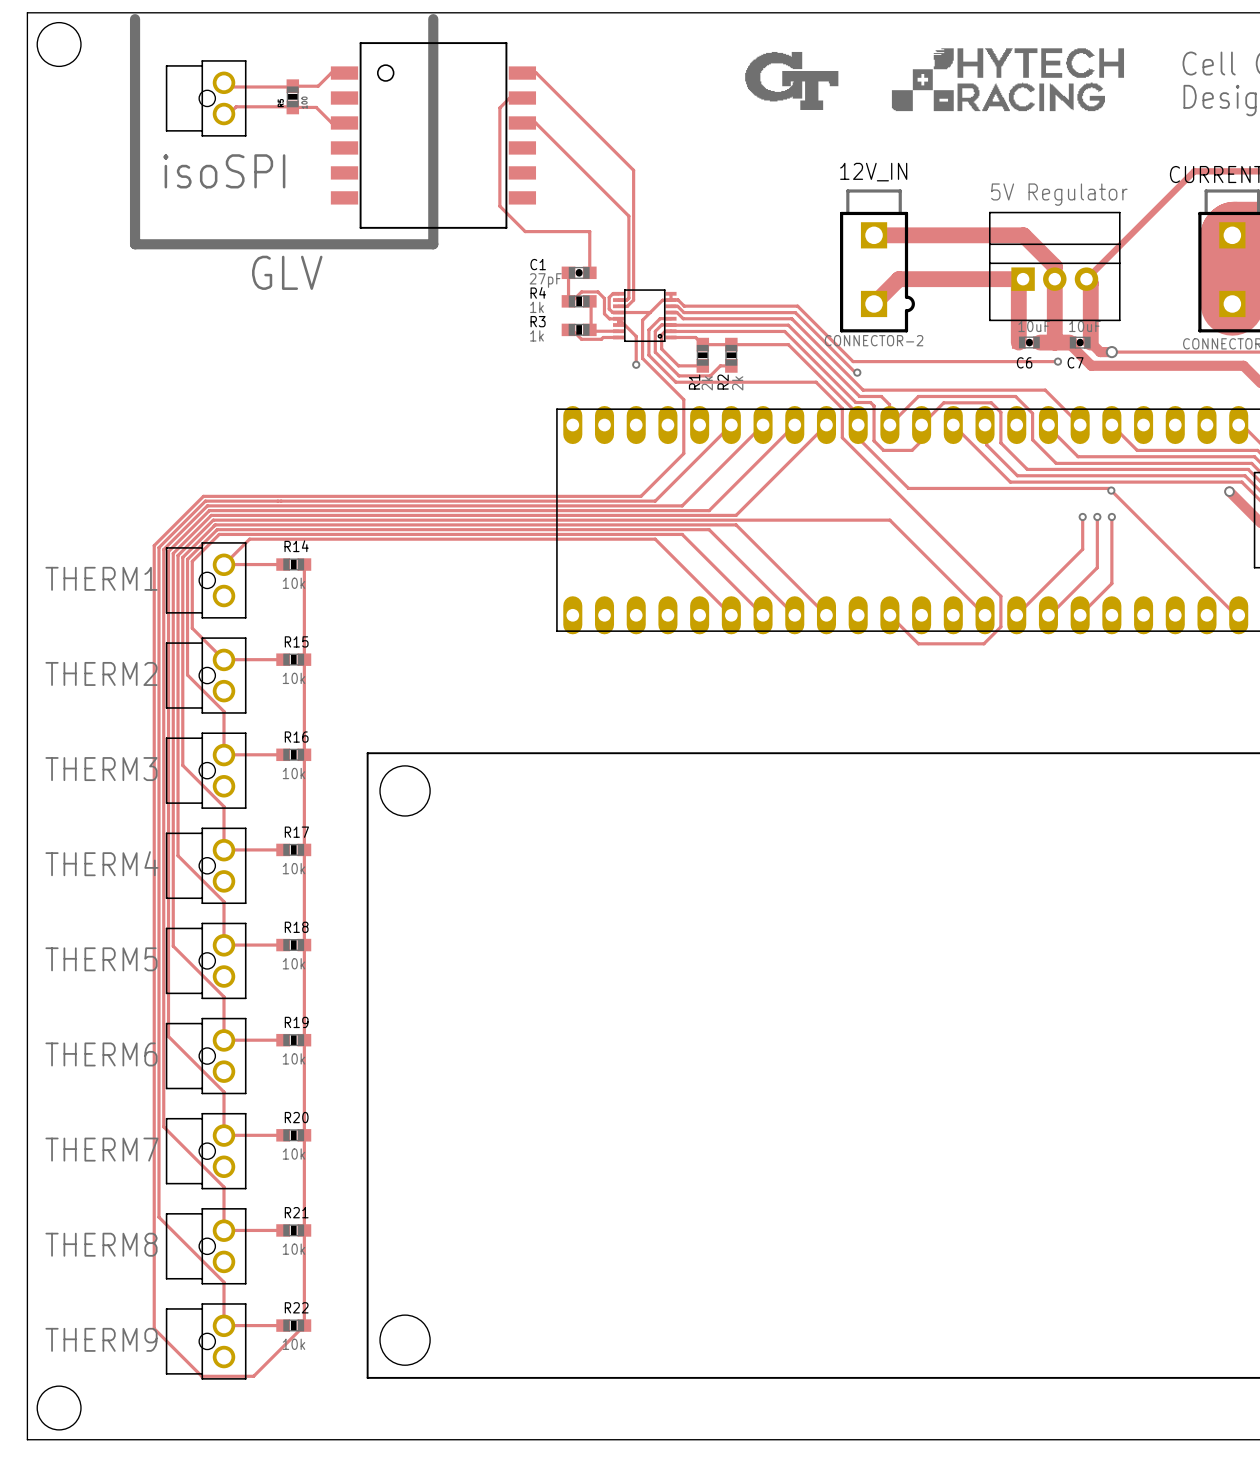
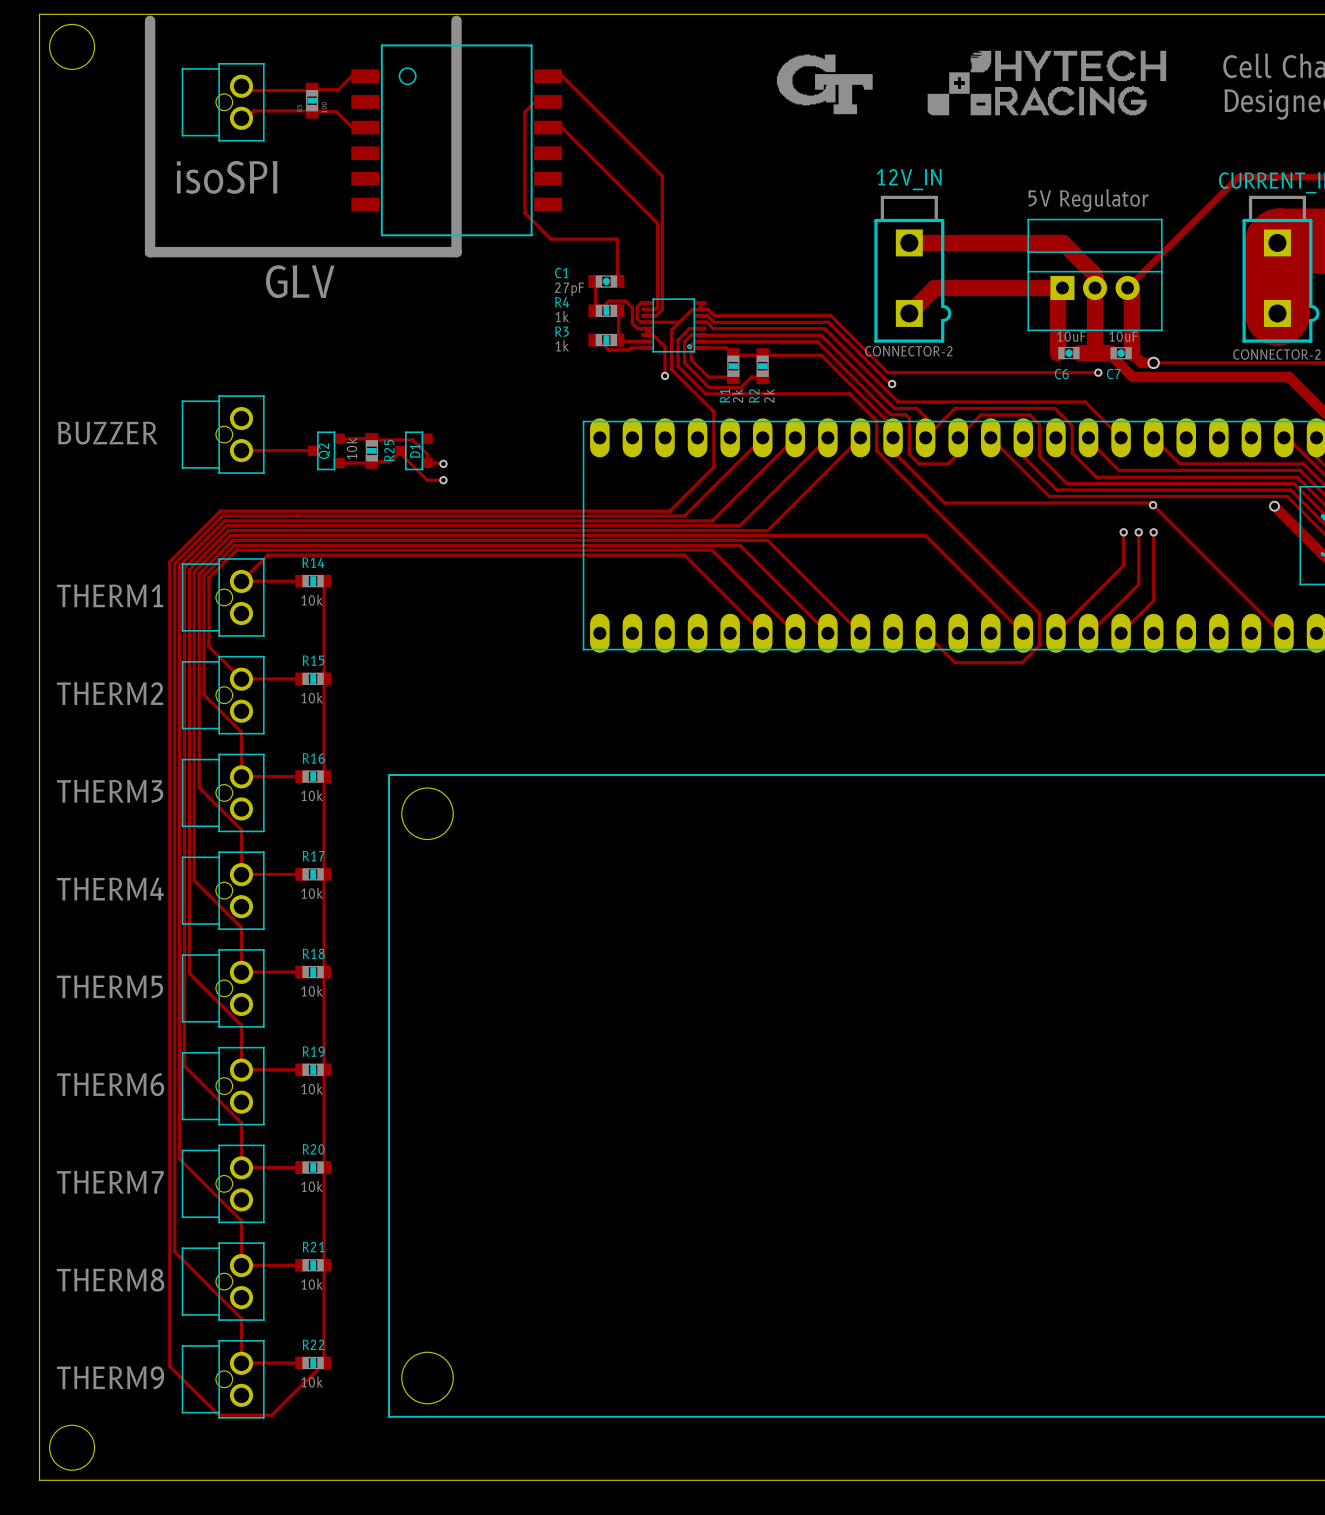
text: none -> BUZZER (107, 433)
part: none -> (223, 434)
track: none -> (339, 438) (412, 439) (427, 454) (426, 463) (443, 463)
track: none -> (241, 450) (313, 450)
Q2: none -> (326, 450)
R25: none -> 10k (371, 450)
D1: none -> (414, 450)
track: none -> (339, 463) (390, 461) (401, 450) (401, 454) (427, 480) (443, 480)
via: none -> (443, 463)
via: none -> (443, 480)

